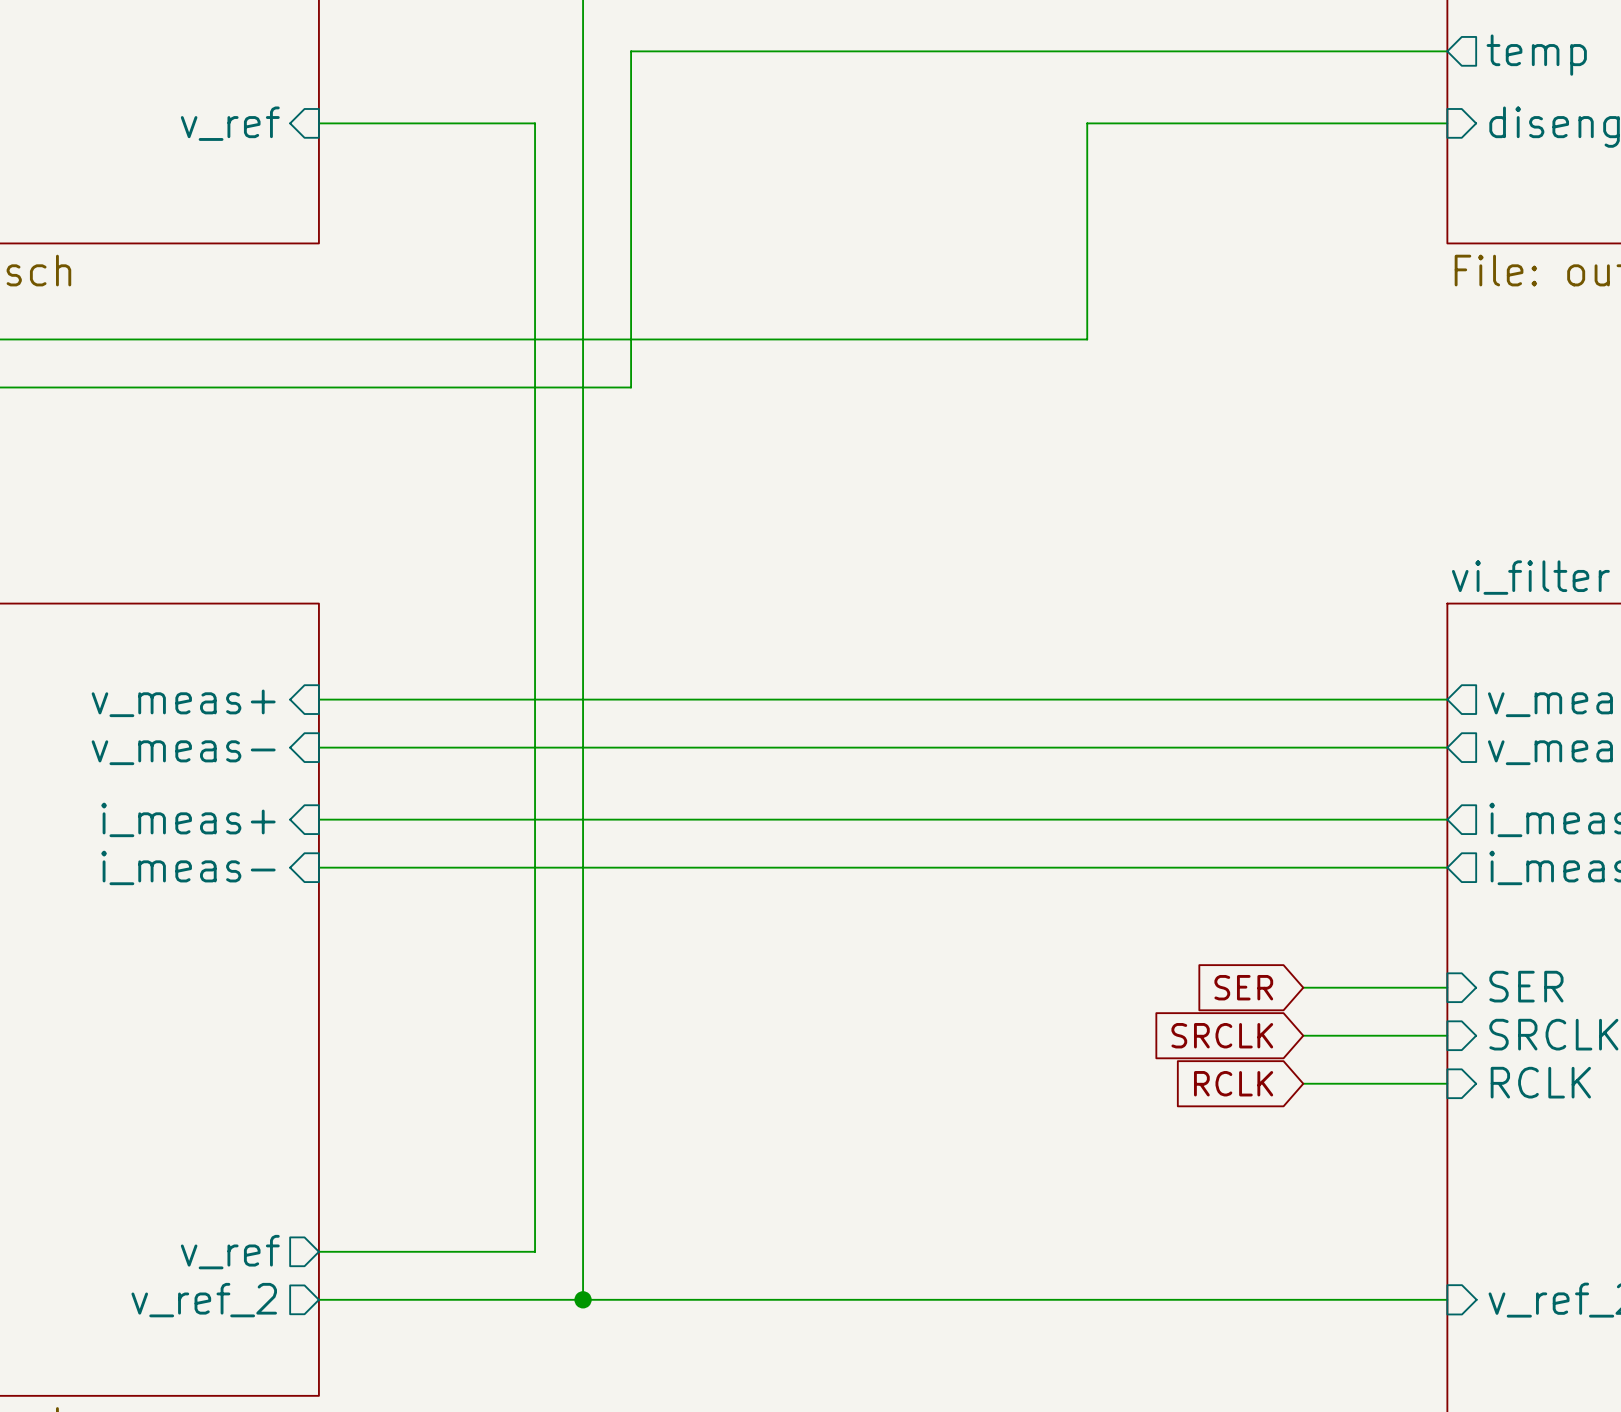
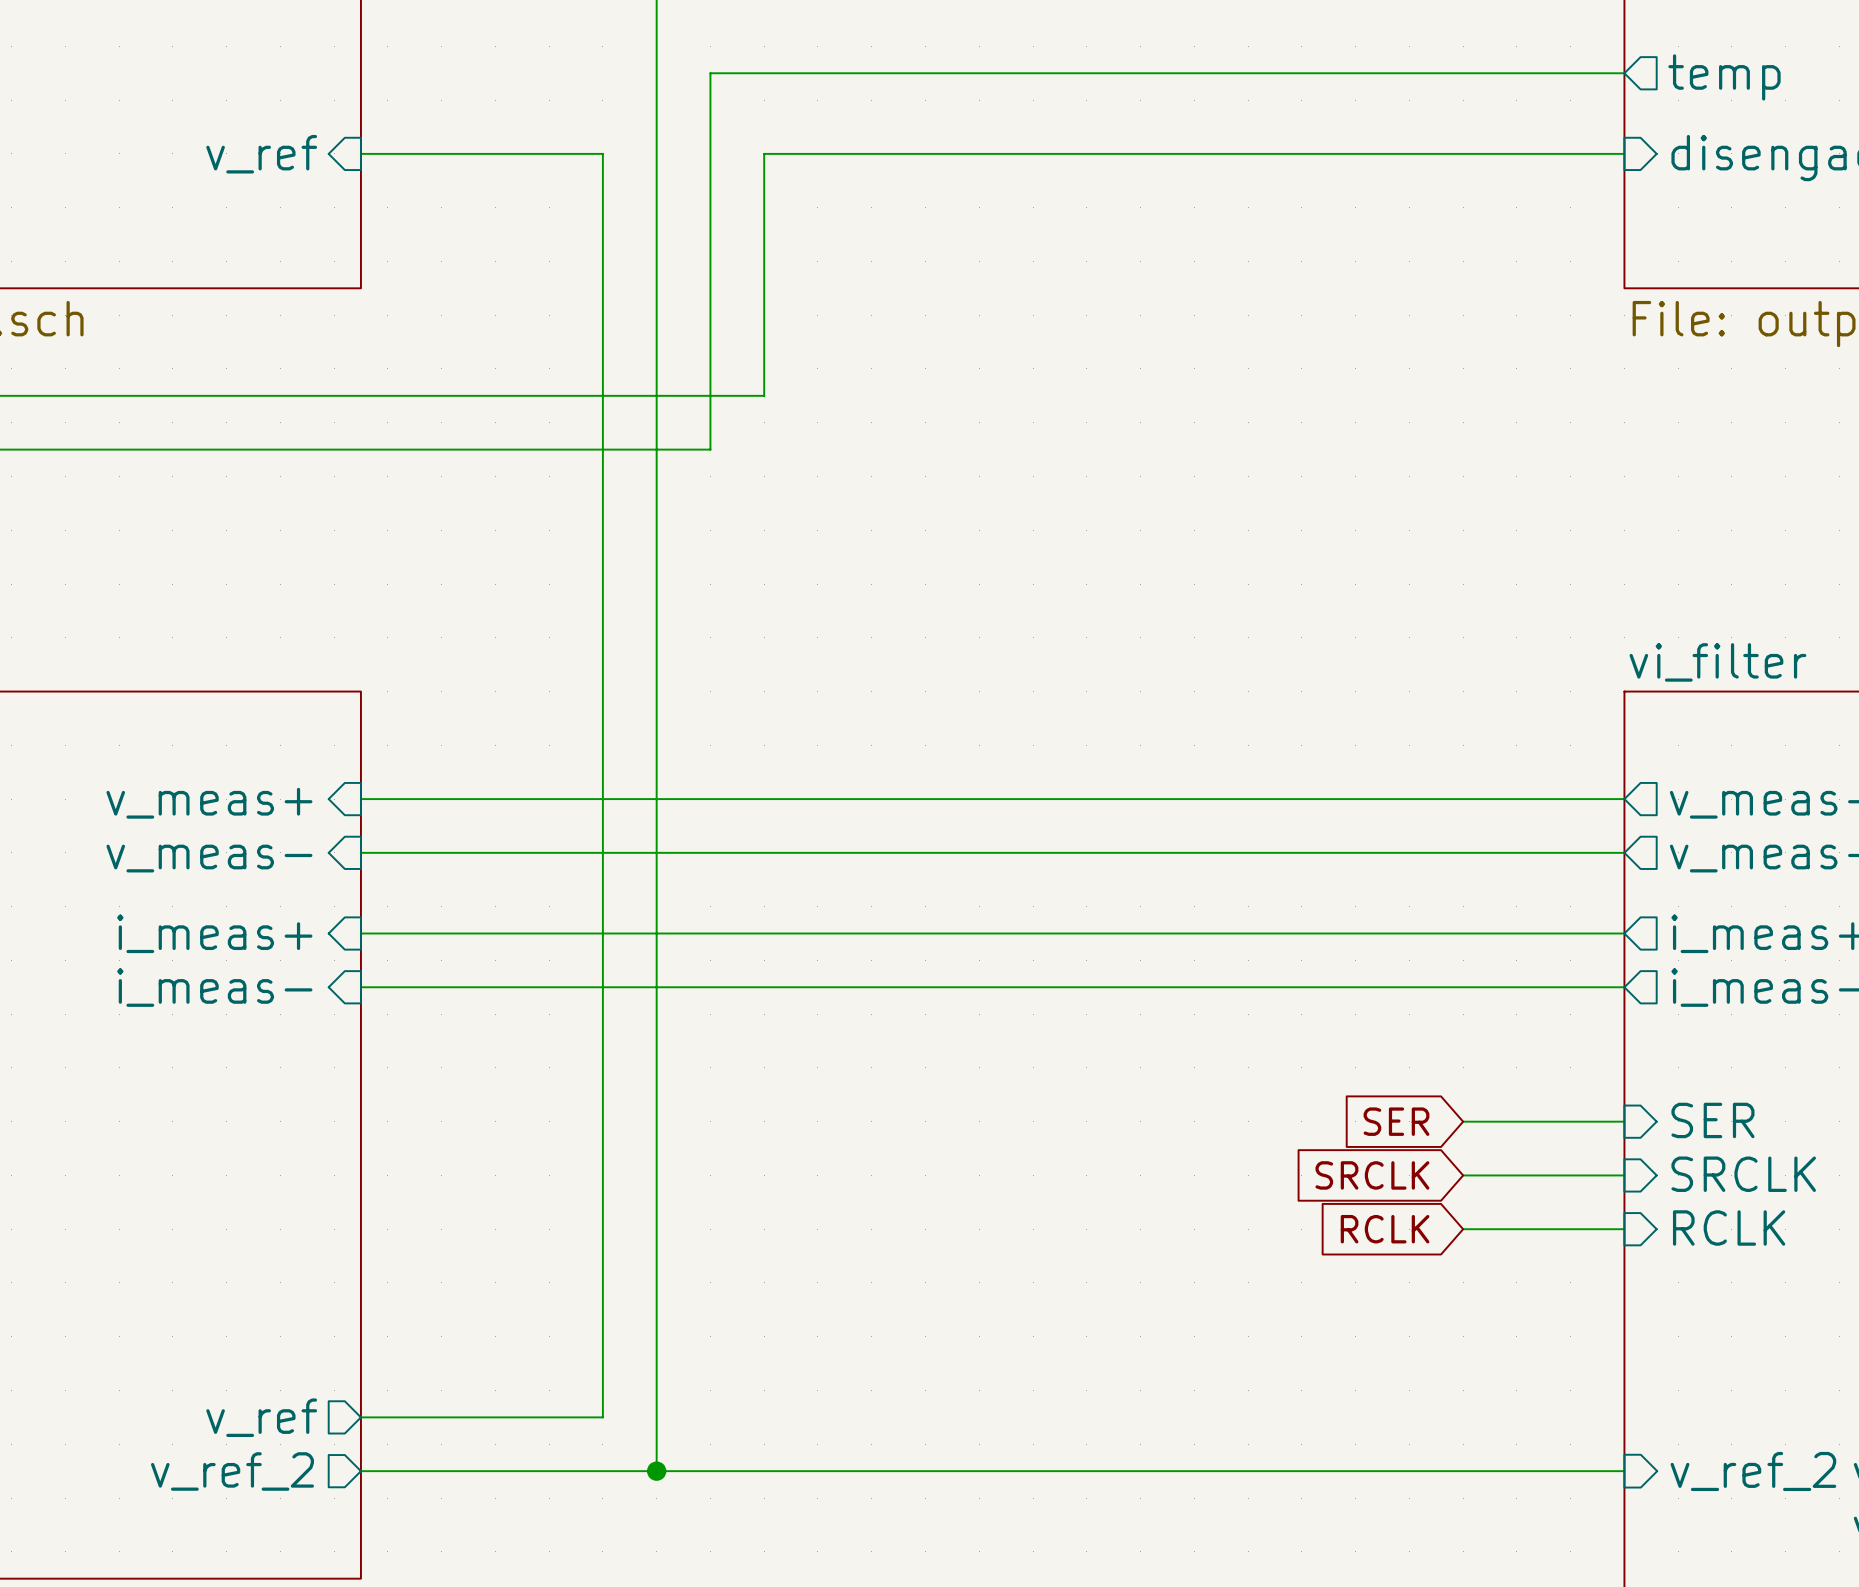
wire: (1087, 123) (1087, 339) (679, 339) -> (1221, 153) (764, 153) (764, 395)

